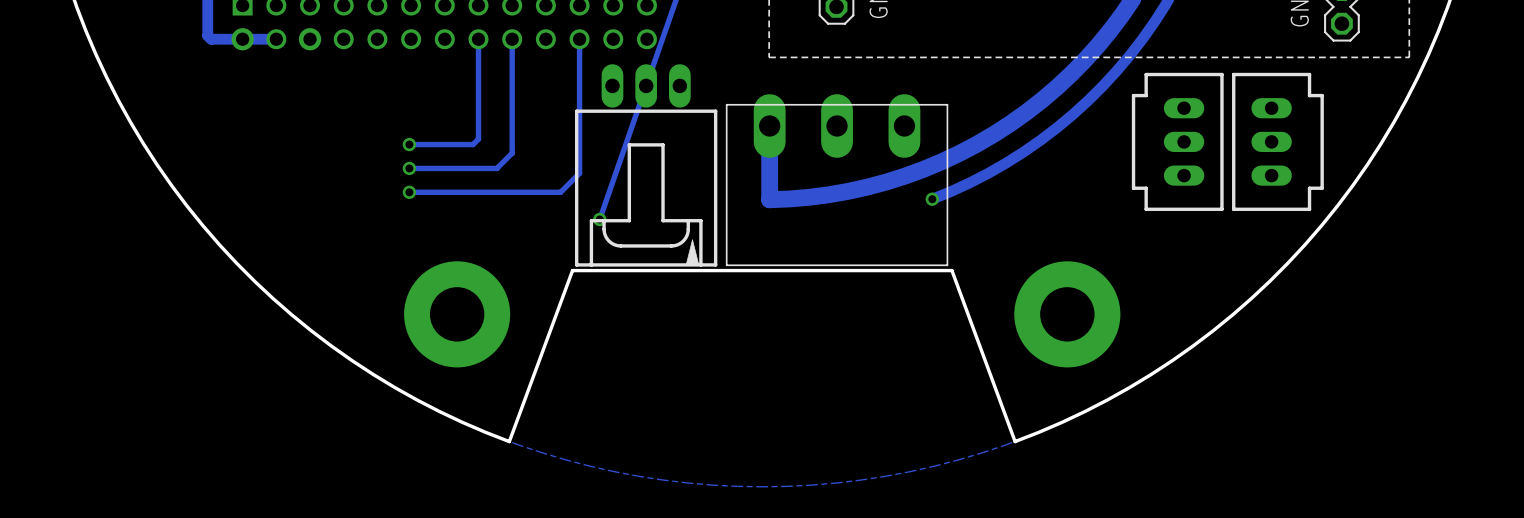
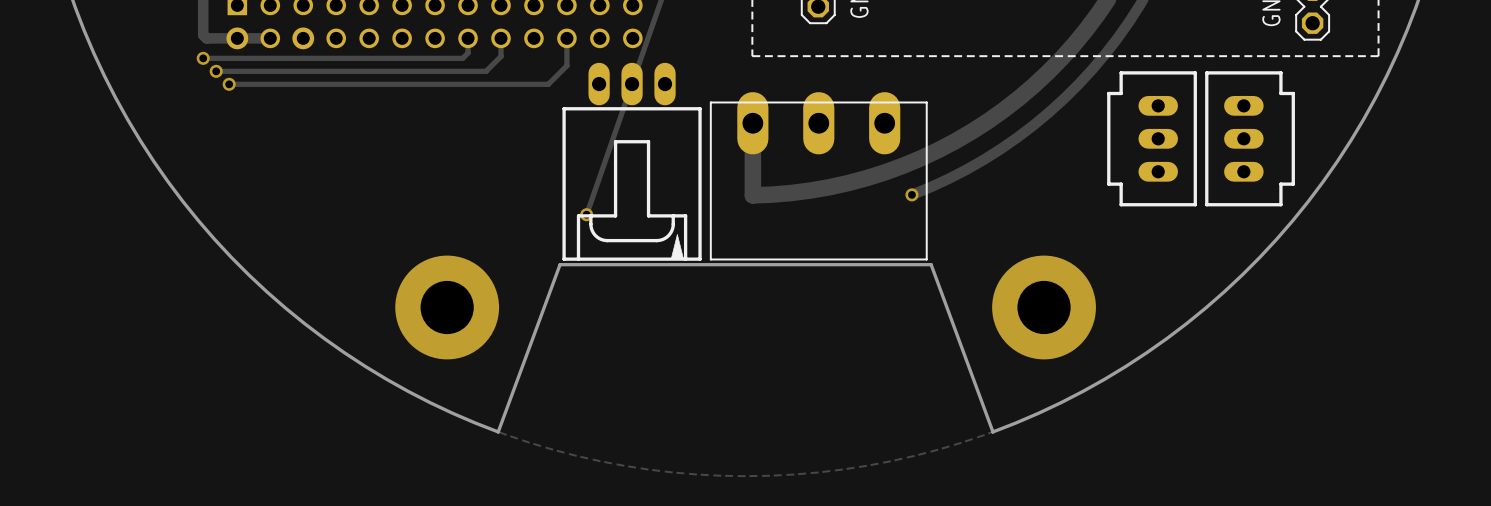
track: (478, 54) (478, 139) (473, 144) (409, 144) -> (468, 53) (462, 58) (203, 58)
track: (512, 57) (512, 153) (496, 168) (409, 168) -> (501, 56) (486, 71) (216, 71)
via: none -> (203, 58)
track: (579, 67) (579, 173) (560, 192) (409, 192) -> (566, 65) (548, 84) (229, 84)
via: none -> (216, 71)
via: none -> (229, 84)
via: (409, 144) -> none
via: (409, 168) -> none
via: (409, 192) -> none

